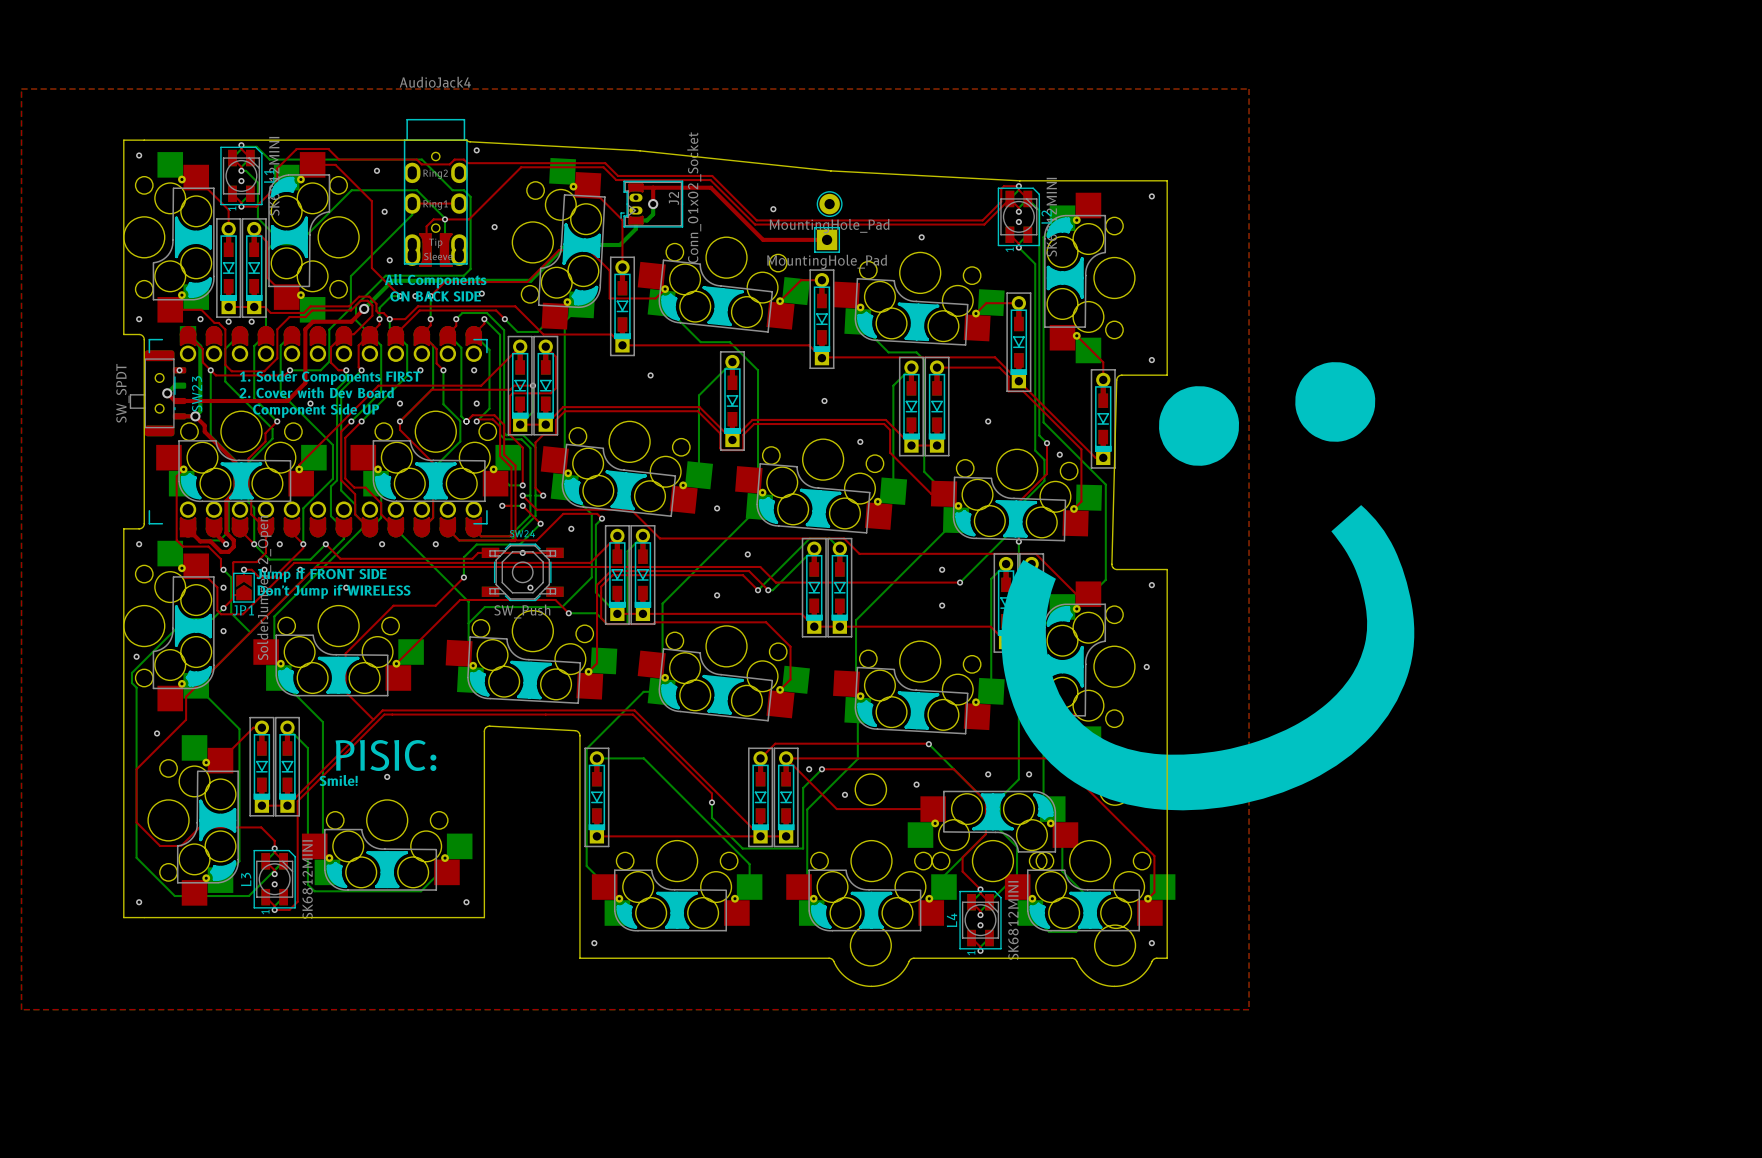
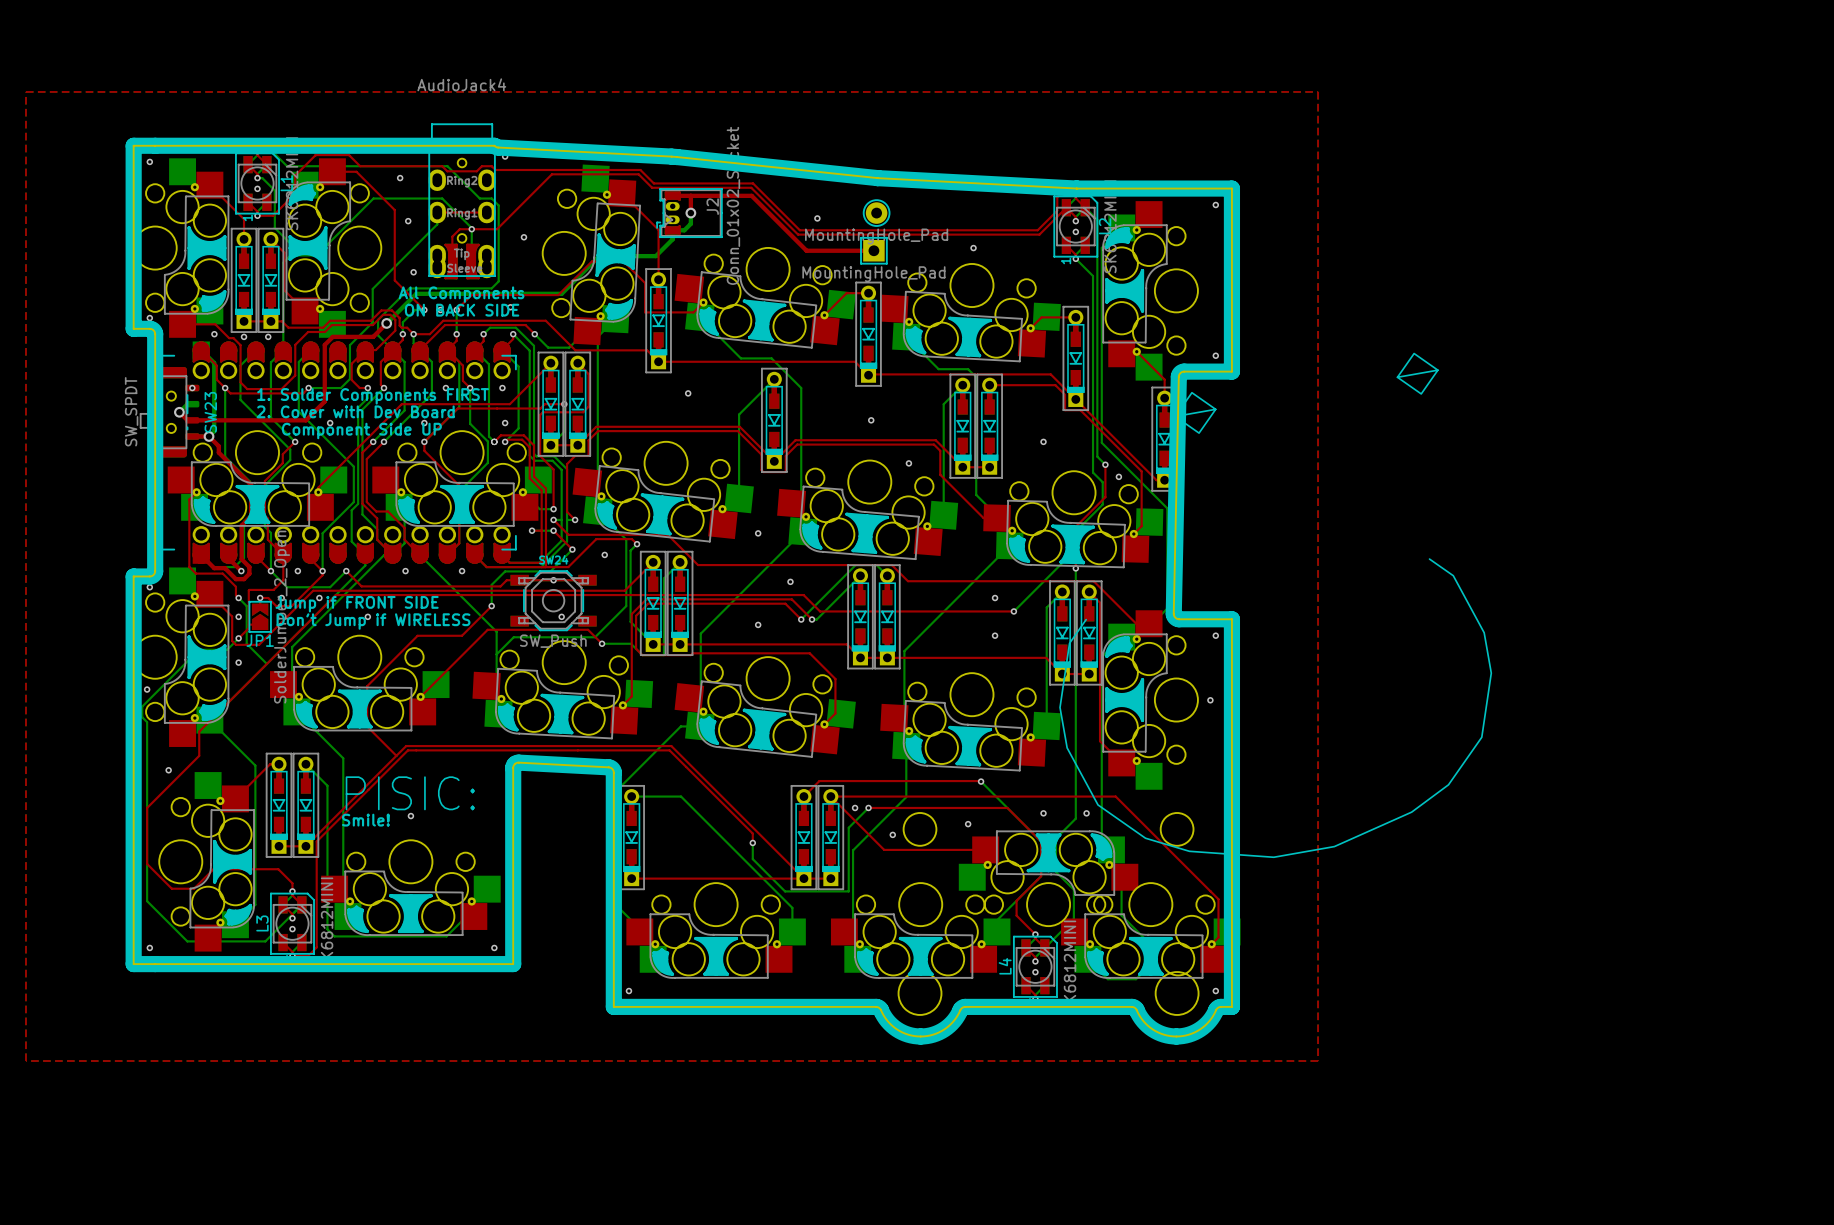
line: none -> (133, 145) (494, 145) (498, 147) (677, 157) (878, 178) (1076, 188) (1231, 188) (1231, 371) (1183, 371) (1178, 376) (1173, 613) (1178, 619) (1231, 619) (1231, 1006) (1218, 1007) (1209, 1021) (1200, 1029) (1188, 1034) (1176, 1036) (1163, 1034) (1152, 1029) (1132, 1006) (964, 1006) (944, 1029) (933, 1034) (920, 1036) (908, 1034) (896, 1029) (876, 1006) (613, 1006) (613, 770) (608, 767) (518, 762) (515, 763) (513, 767) (513, 964) (133, 964) (133, 576) (150, 576) (155, 571) (155, 333) (150, 328) (133, 328) (133, 145)
board edge: (123, 314) (123, 334) (140, 334) (144, 339) -> (133, 328) (150, 328) (153, 330) (155, 355)
via position: (139, 319) -> (149, 318)
board edge: (1167, 354) (1167, 375) (1121, 375) (1116, 379) (1111, 564) (1116, 569) (1167, 569) (1167, 589) -> (1231, 371) (1183, 371) (1178, 375) (1173, 613) (1178, 619) (1231, 619)
via position: (1151, 360) -> (1215, 355)
board edge: (144, 523) (140, 528) (123, 528) (123, 549) -> (155, 549) (153, 574) (150, 576) (133, 576)
via position: (139, 544) -> (149, 587)
via position: (1151, 585) -> (1215, 635)

